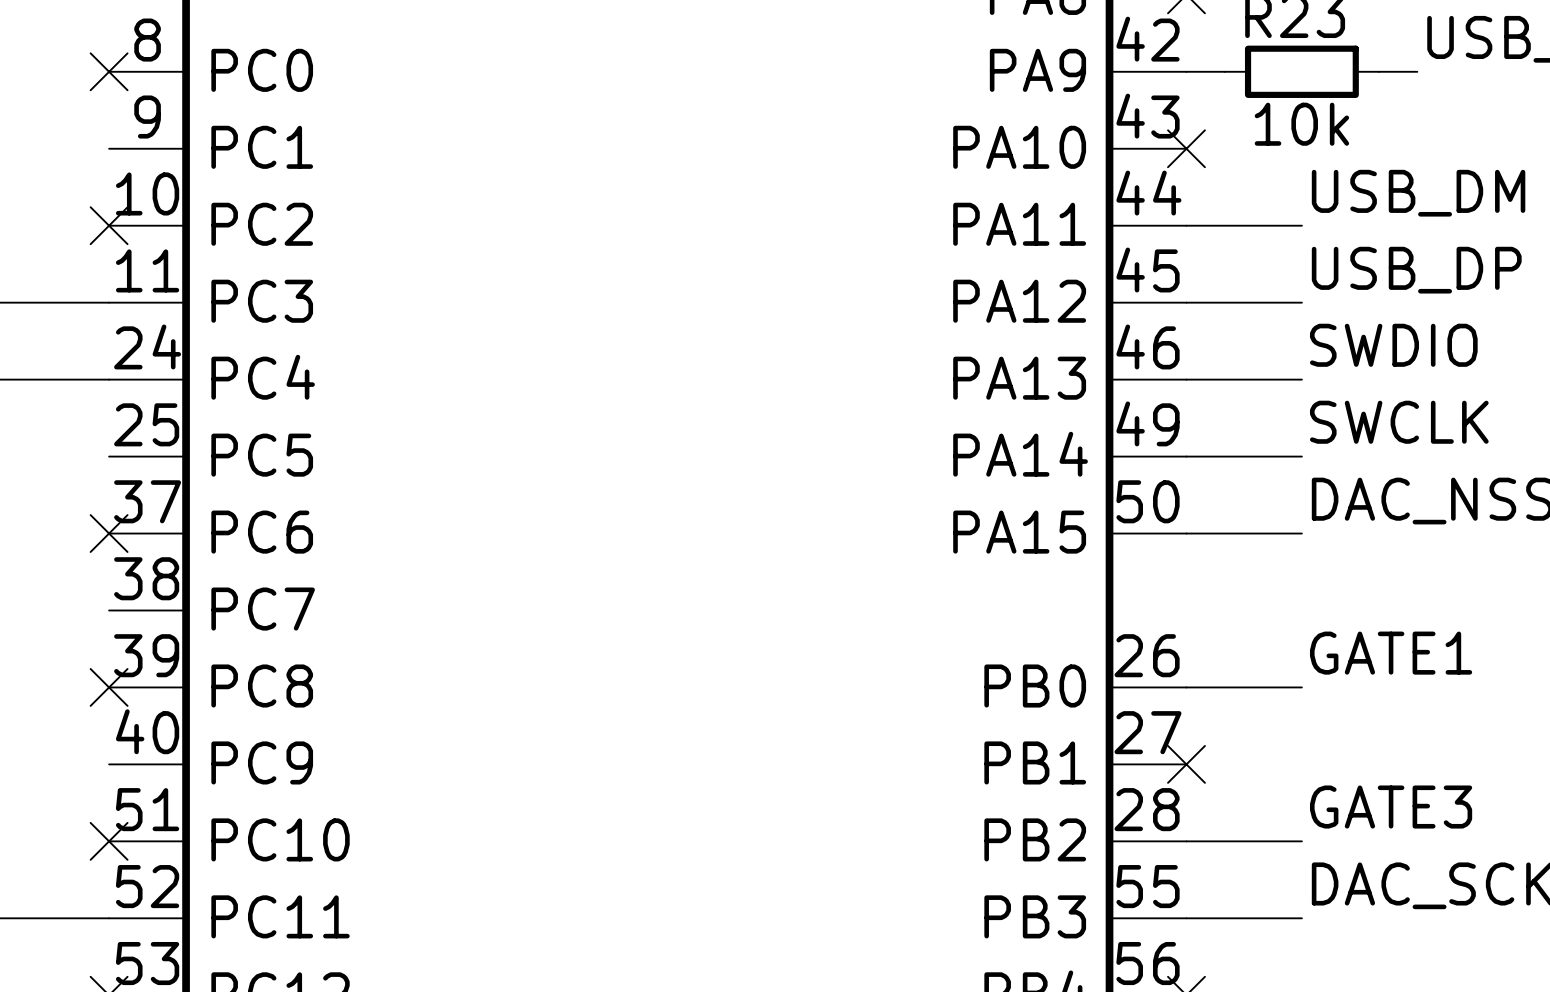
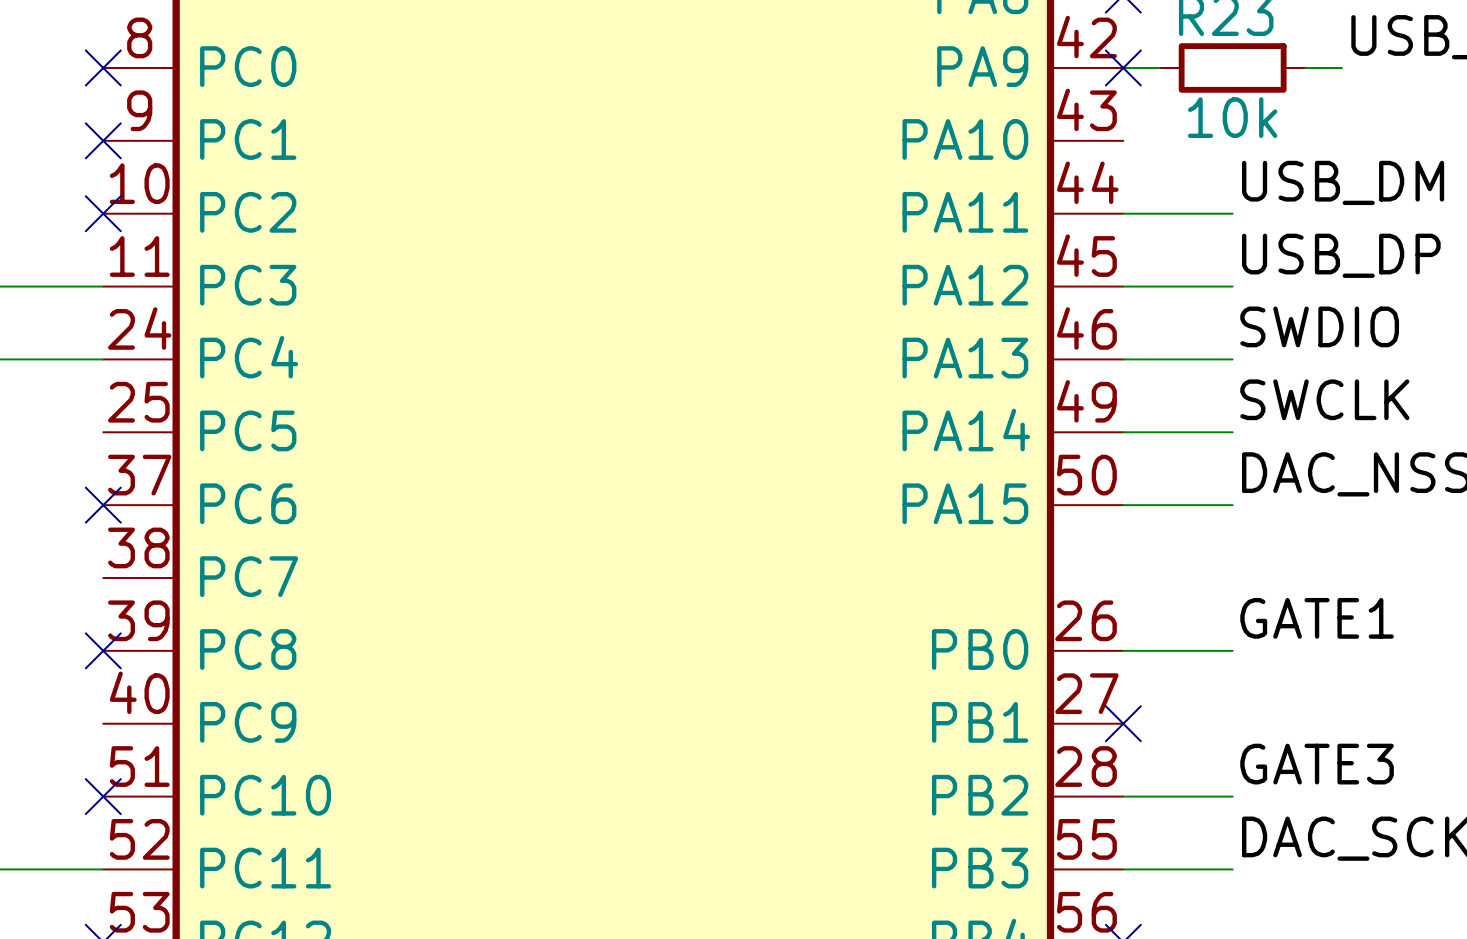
no-connect mark: none -> (103, 140)
no-connect mark position: (1186, 148) -> (1123, 67)

